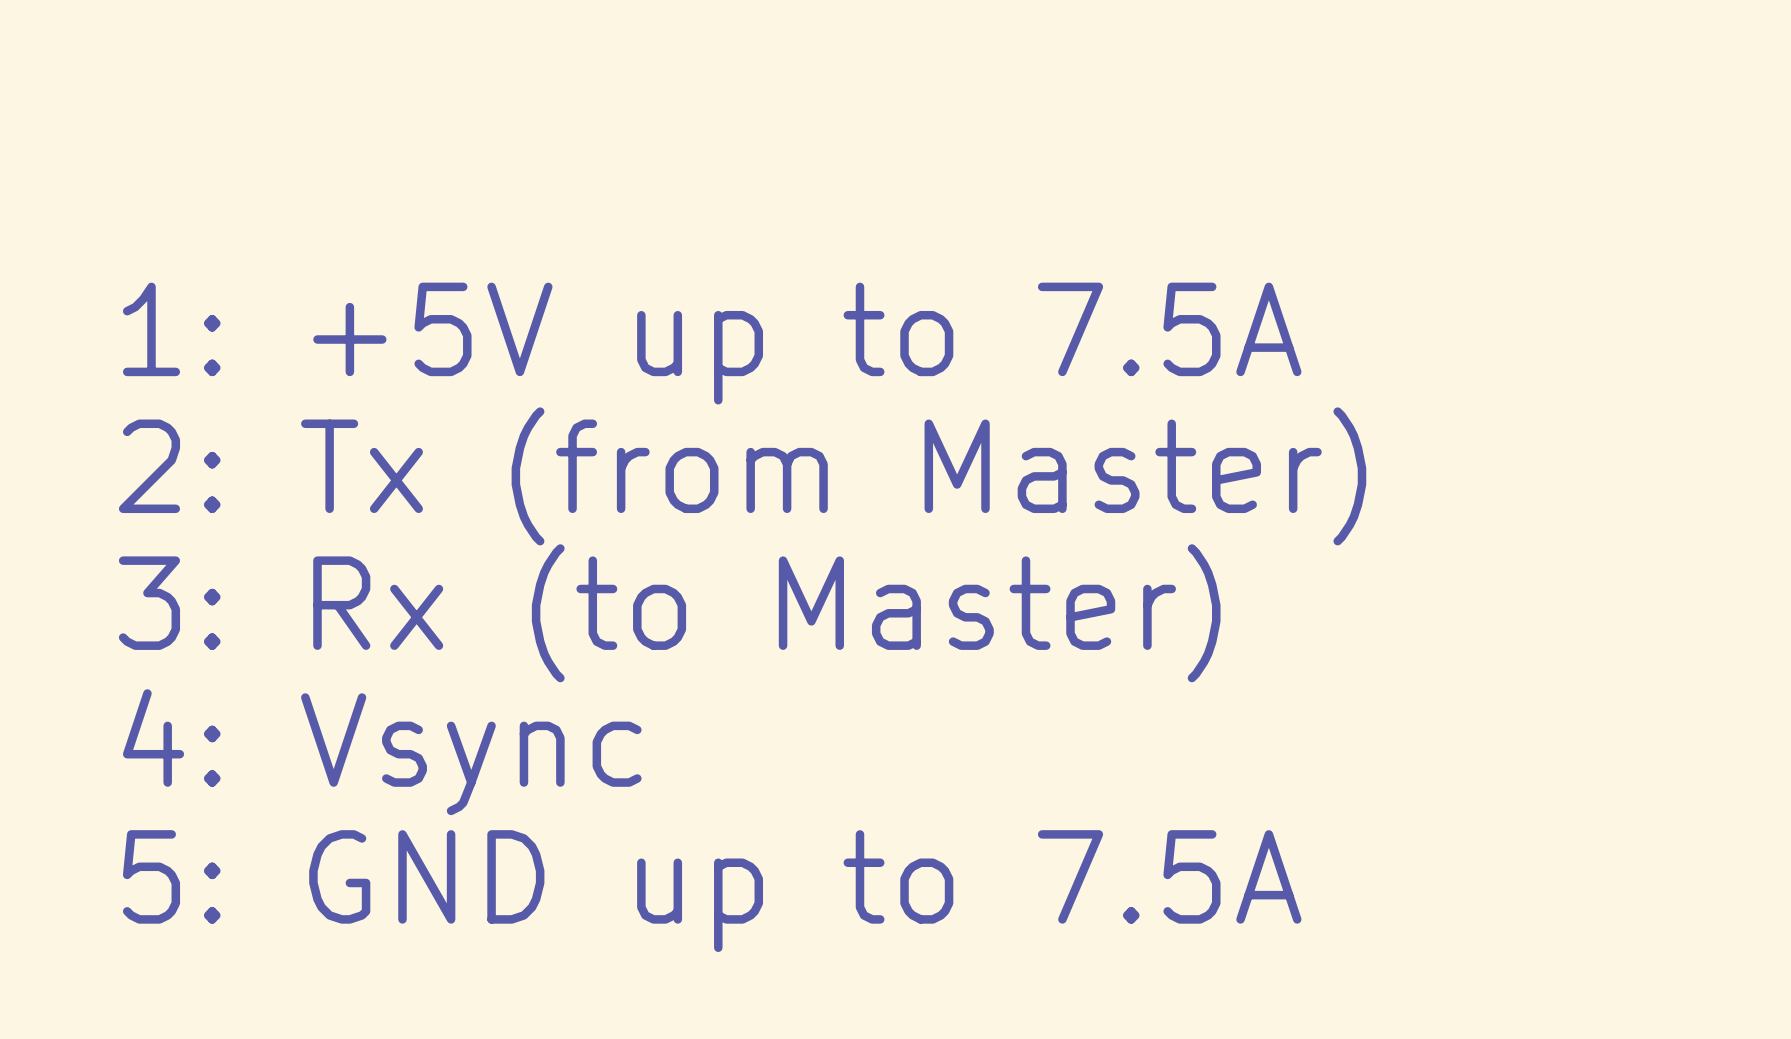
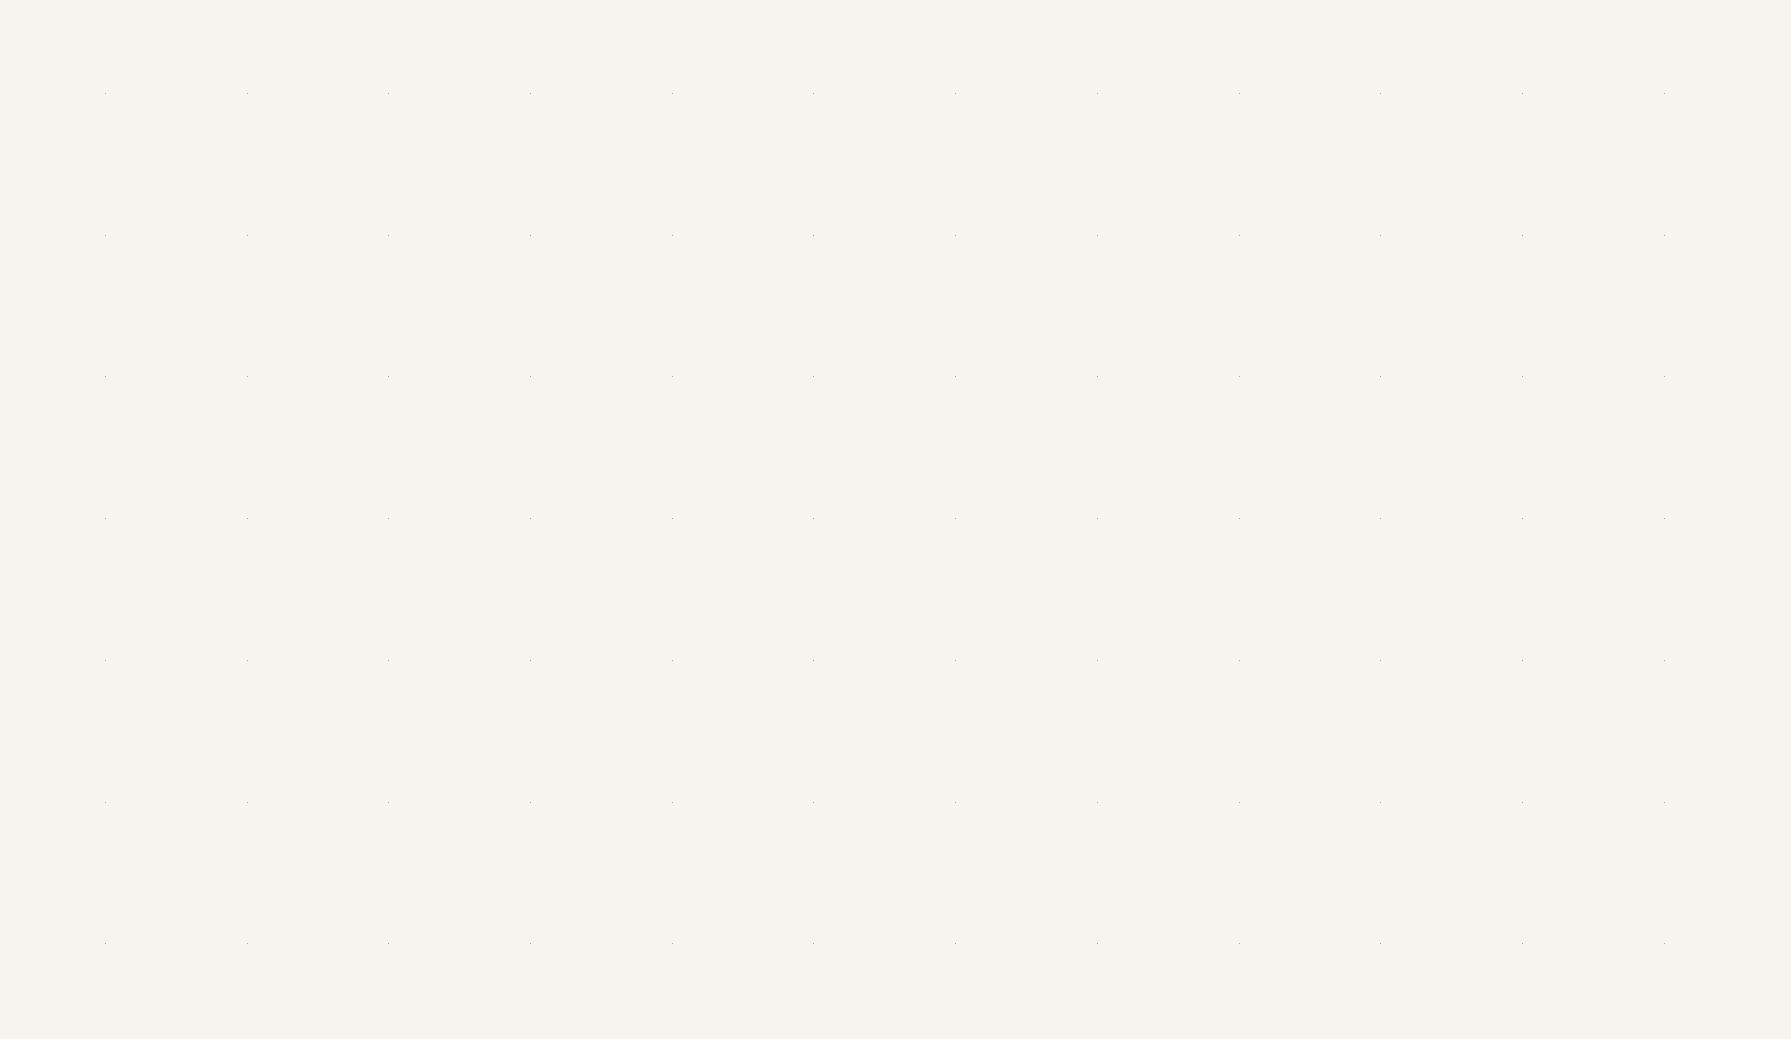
text: 1: +5V up to 7.5A (712, 343) -> none
text: 2: Tx (from Master) (742, 476) -> none
text: 3: Rx (to Master) (669, 613) -> none
text: 4: Vsync (382, 752) -> none
text: 5: GND up to 7.5A (712, 891) -> none

